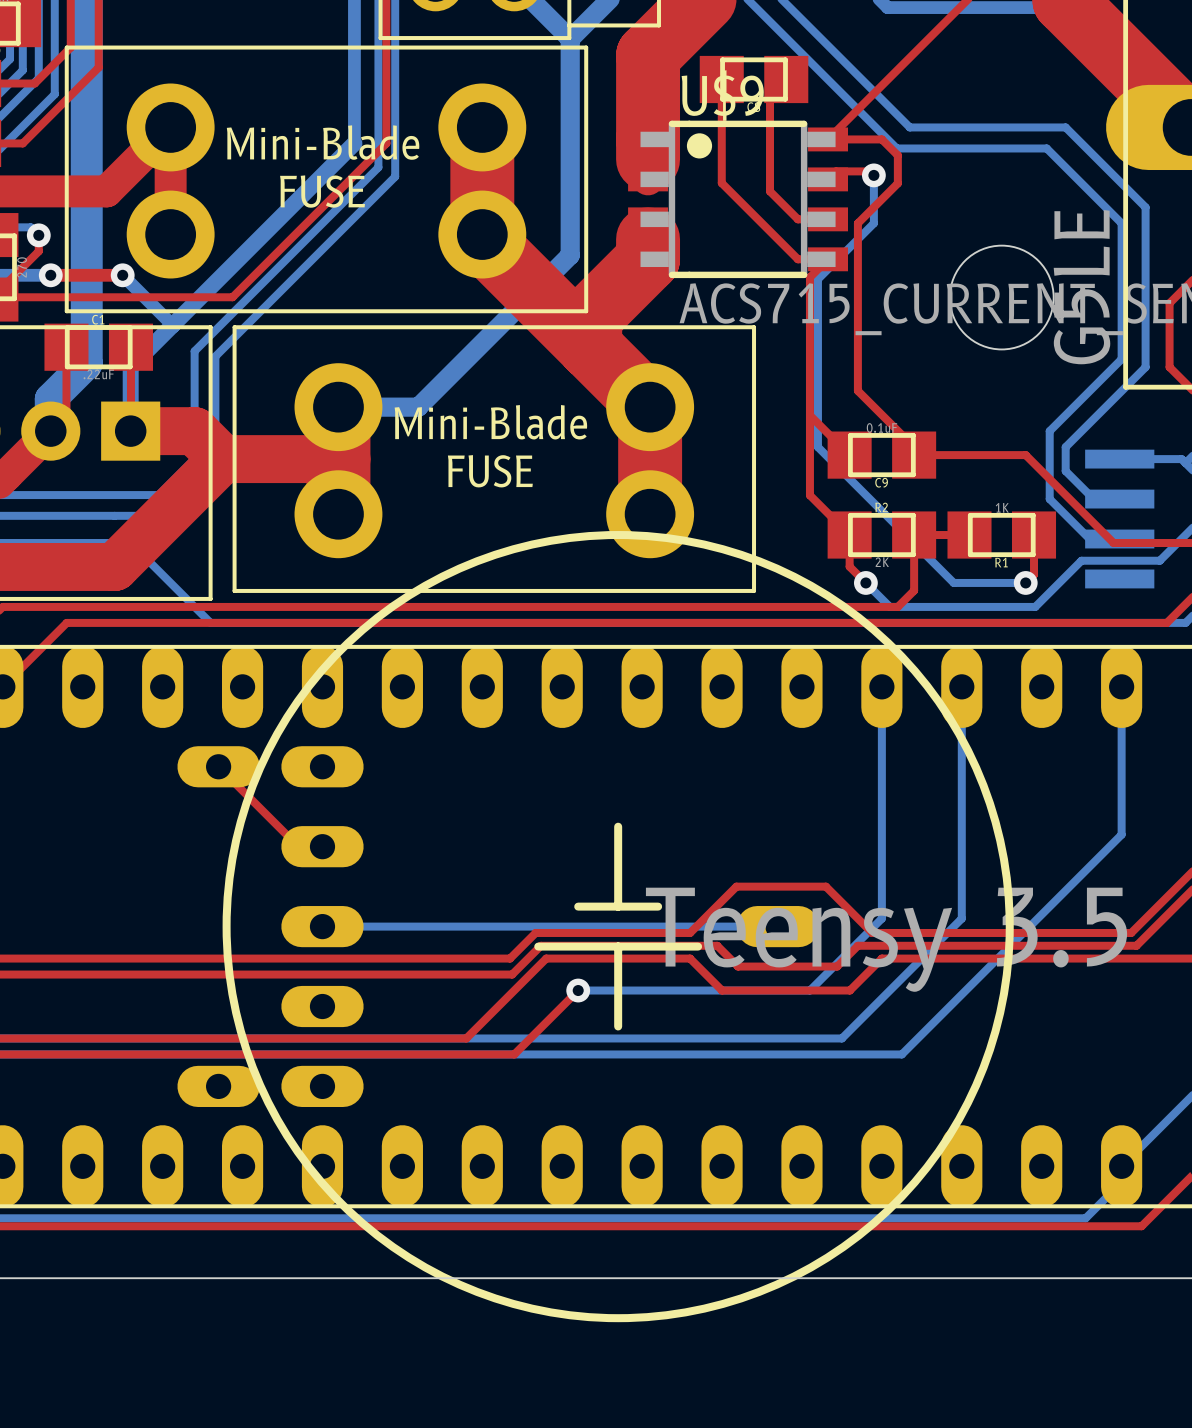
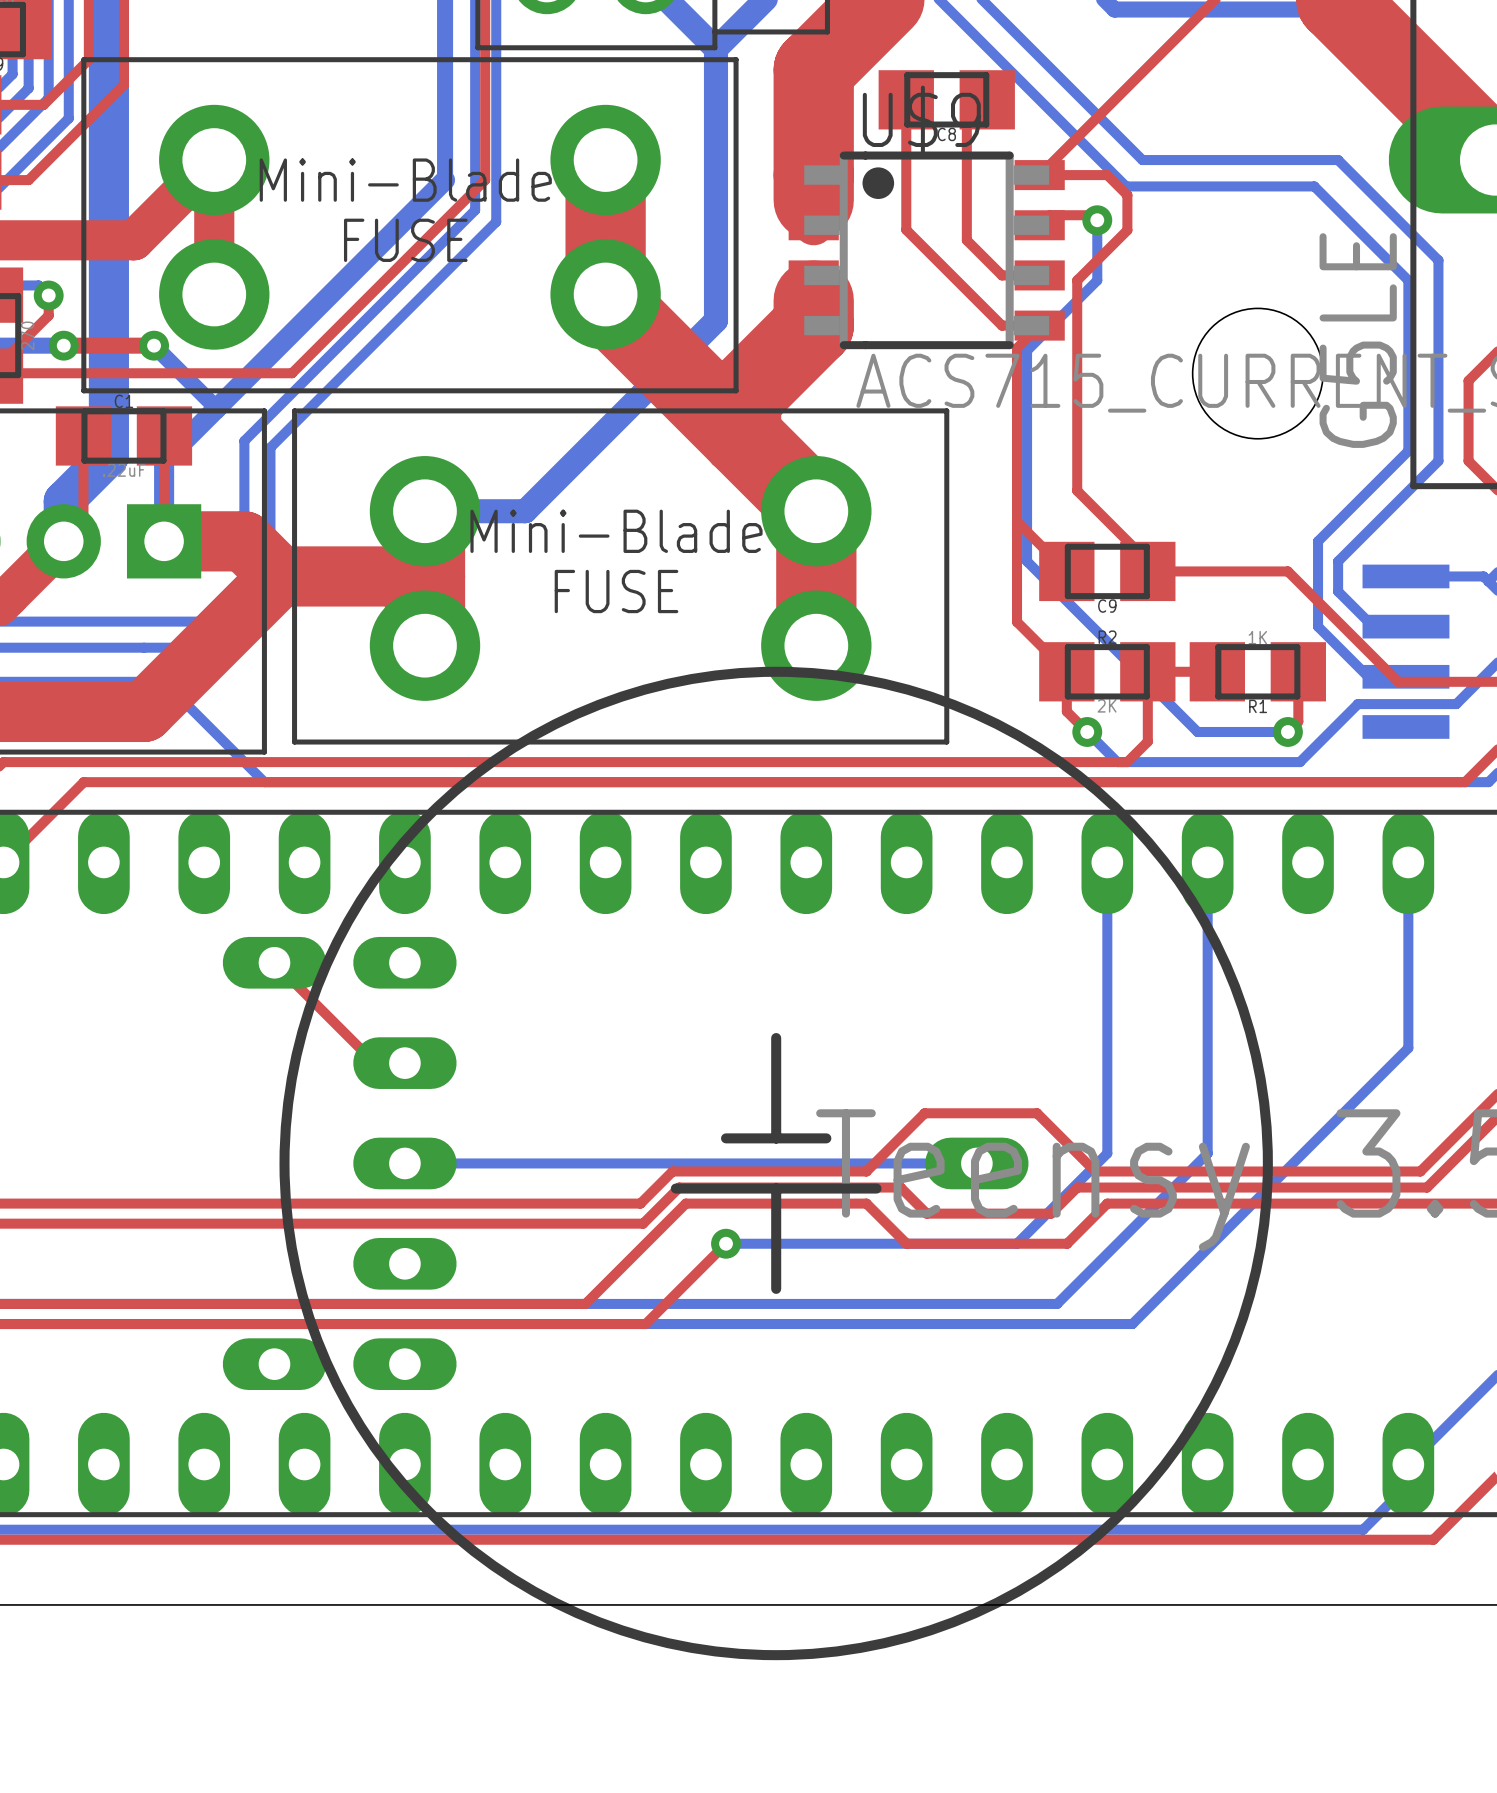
C9 value: 0.1uF (881, 427) -> none

